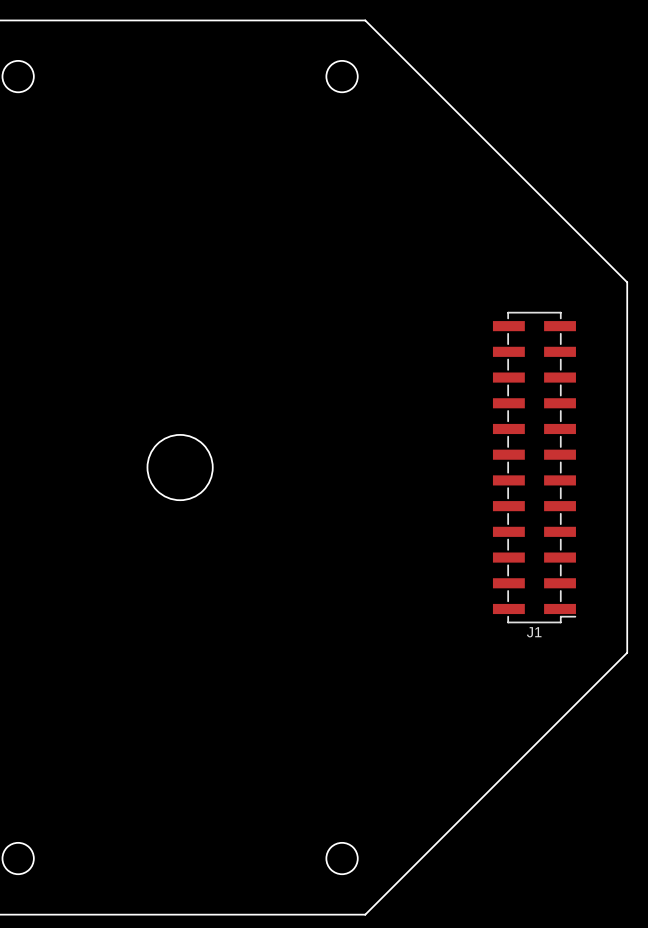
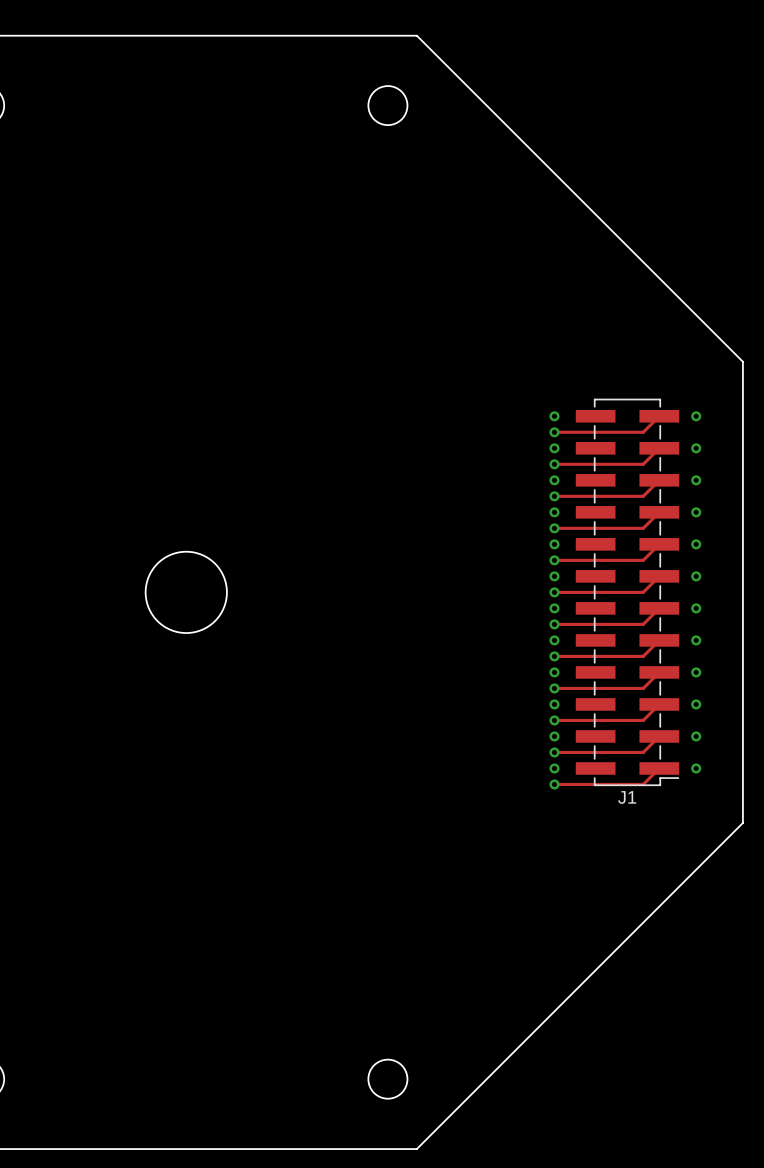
via: none -> (554, 416)
track: none -> (659, 416) (643, 432) (554, 432)
via: none -> (696, 416)
via: none -> (554, 432)
via: none -> (554, 448)
track: none -> (659, 448) (643, 464) (554, 464)
via: none -> (696, 448)
via: none -> (554, 464)
via: none -> (554, 480)
track: none -> (659, 480) (643, 496) (554, 496)
via: none -> (696, 480)
via: none -> (554, 496)
via: none -> (554, 512)
track: none -> (659, 512) (643, 528) (554, 528)
via: none -> (696, 512)
via: none -> (554, 528)
via: none -> (554, 544)
track: none -> (659, 544) (643, 560) (554, 560)
via: none -> (696, 544)
via: none -> (554, 560)
via: none -> (554, 576)
track: none -> (659, 576) (643, 592) (554, 592)
via: none -> (696, 576)
via: none -> (554, 592)
via: none -> (554, 608)
track: none -> (659, 608) (643, 624) (554, 624)
via: none -> (696, 608)
via: none -> (554, 624)
via: none -> (554, 640)
track: none -> (659, 640) (643, 656) (554, 656)
via: none -> (696, 640)
via: none -> (554, 656)
via: none -> (554, 672)
track: none -> (659, 672) (643, 688) (554, 688)
via: none -> (696, 672)
via: none -> (554, 688)
via: none -> (554, 704)
track: none -> (659, 704) (643, 720) (554, 720)
via: none -> (696, 704)
via: none -> (554, 720)
via: none -> (554, 736)
track: none -> (659, 736) (643, 752) (554, 752)
via: none -> (696, 736)
via: none -> (554, 752)
via: none -> (554, 768)
track: none -> (659, 768) (643, 784) (554, 784)
via: none -> (696, 768)
via: none -> (554, 784)

